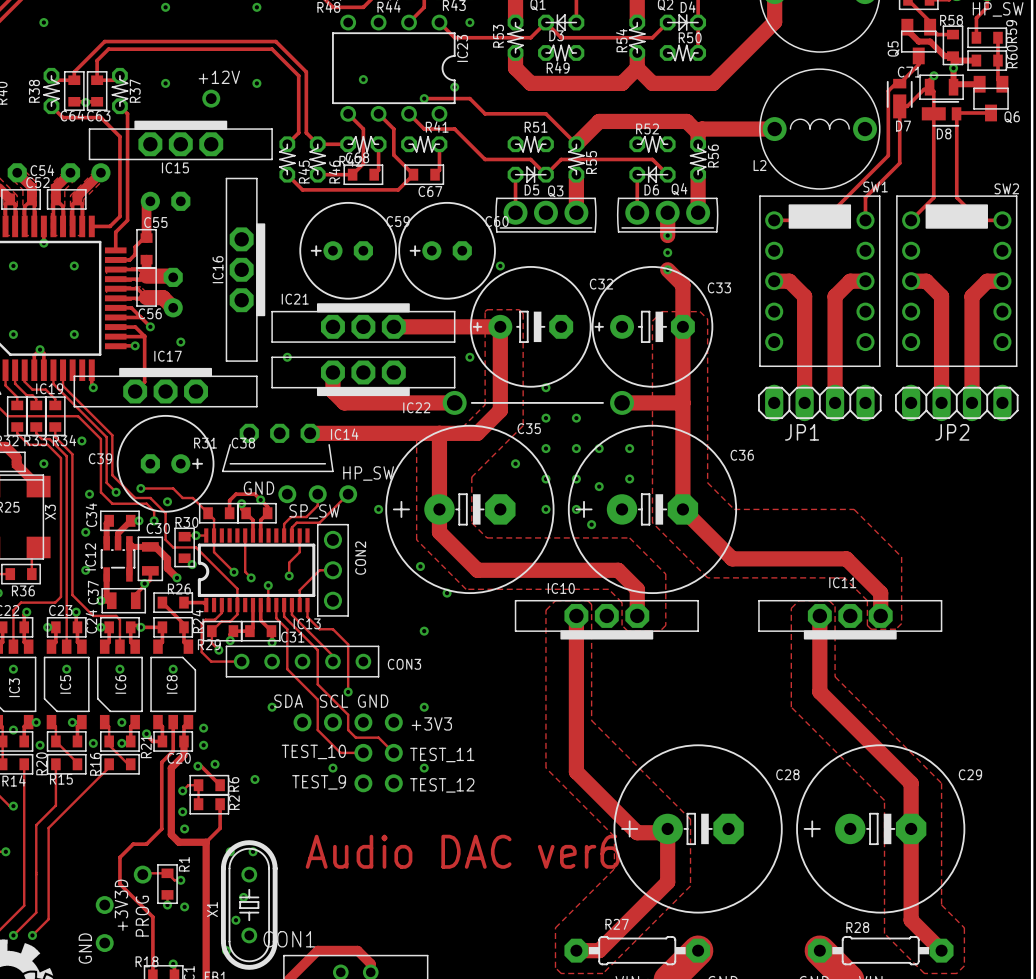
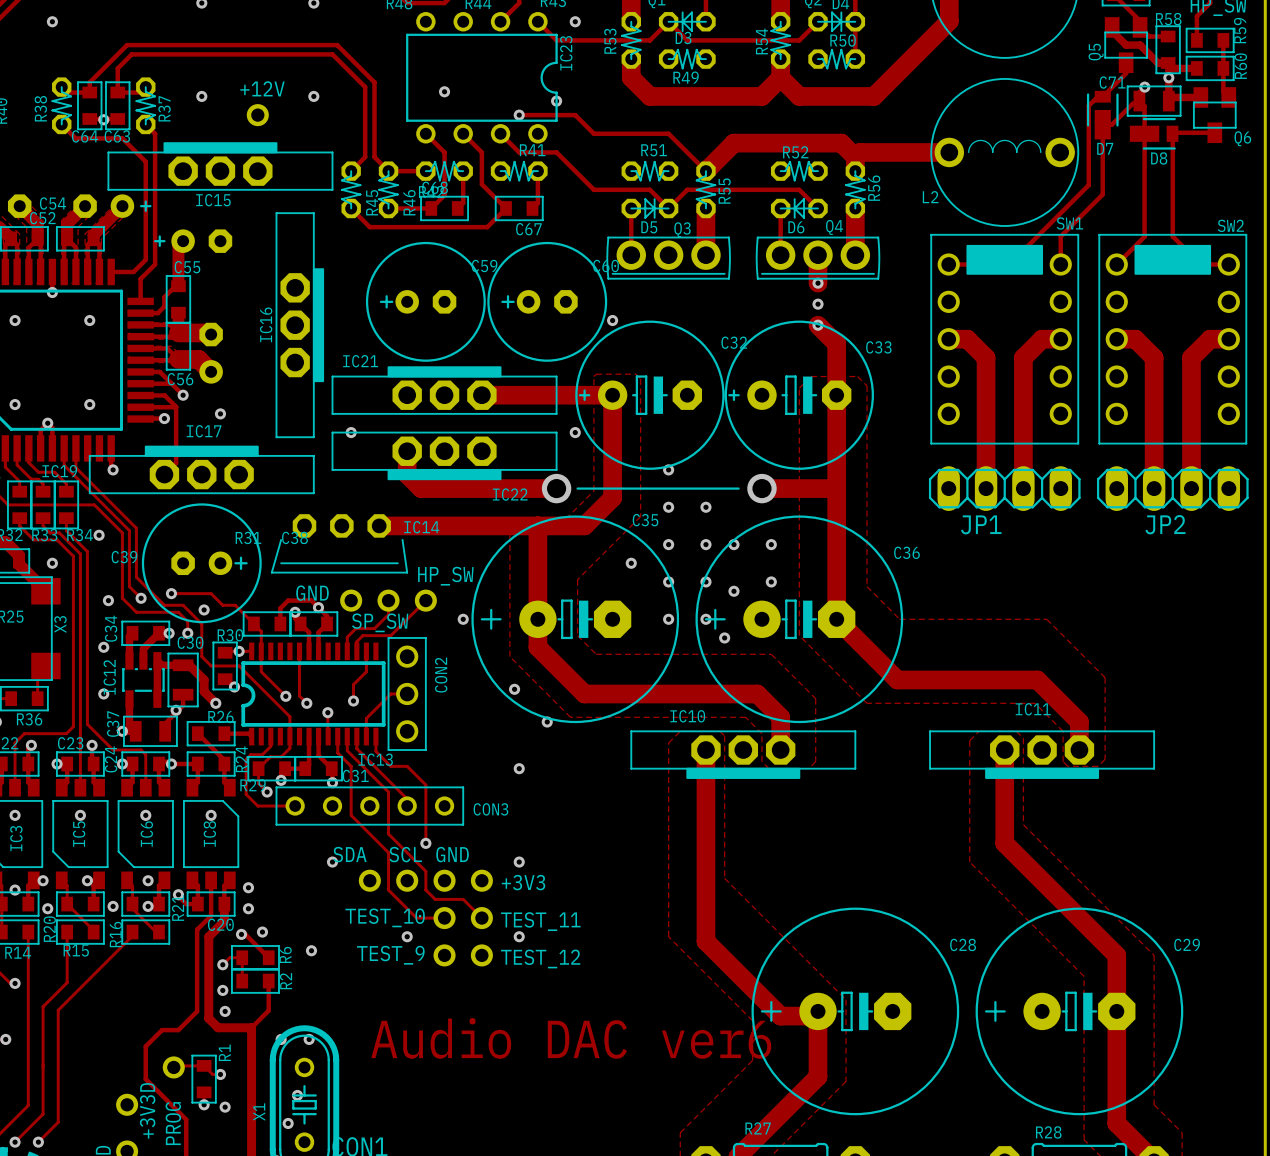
line: none -> (145, 201) (145, 210)
line: none -> (141, 206) (150, 206)
line: none -> (159, 236) (159, 245)
line: none -> (155, 241) (164, 241)

